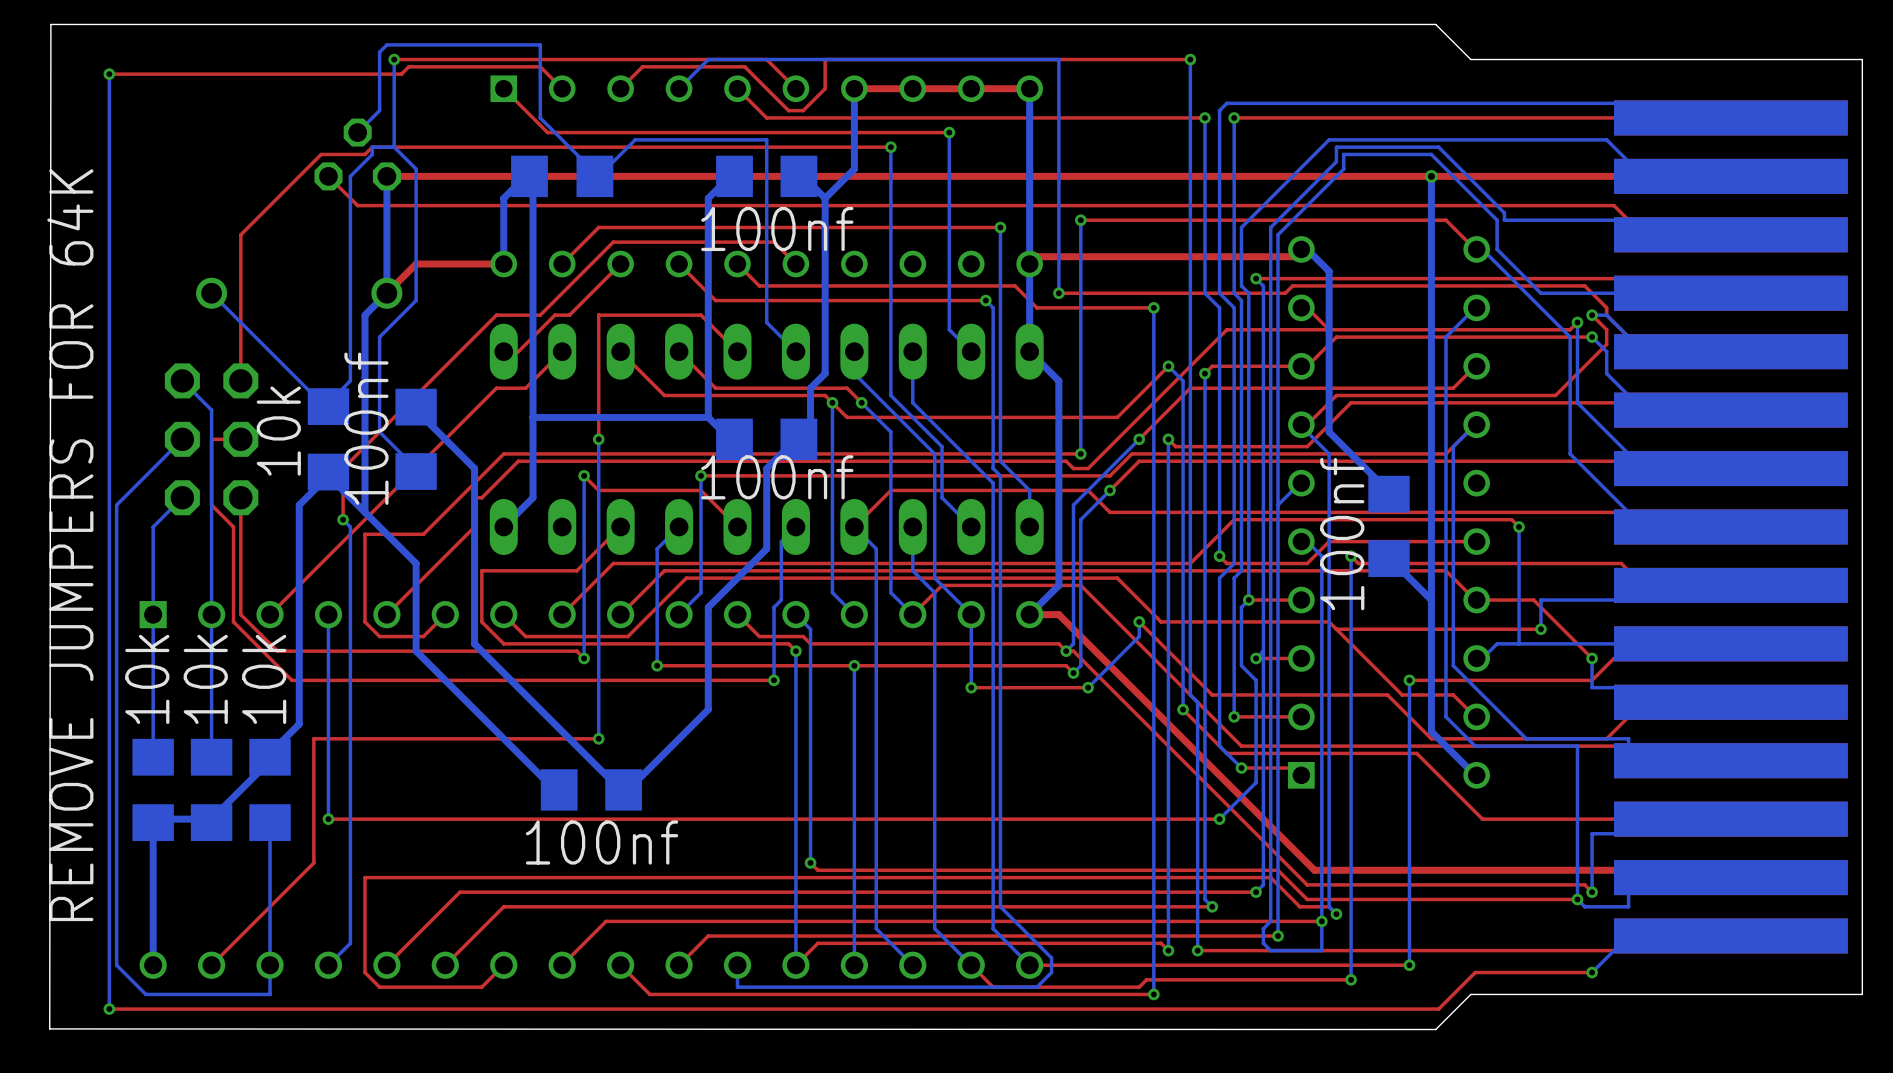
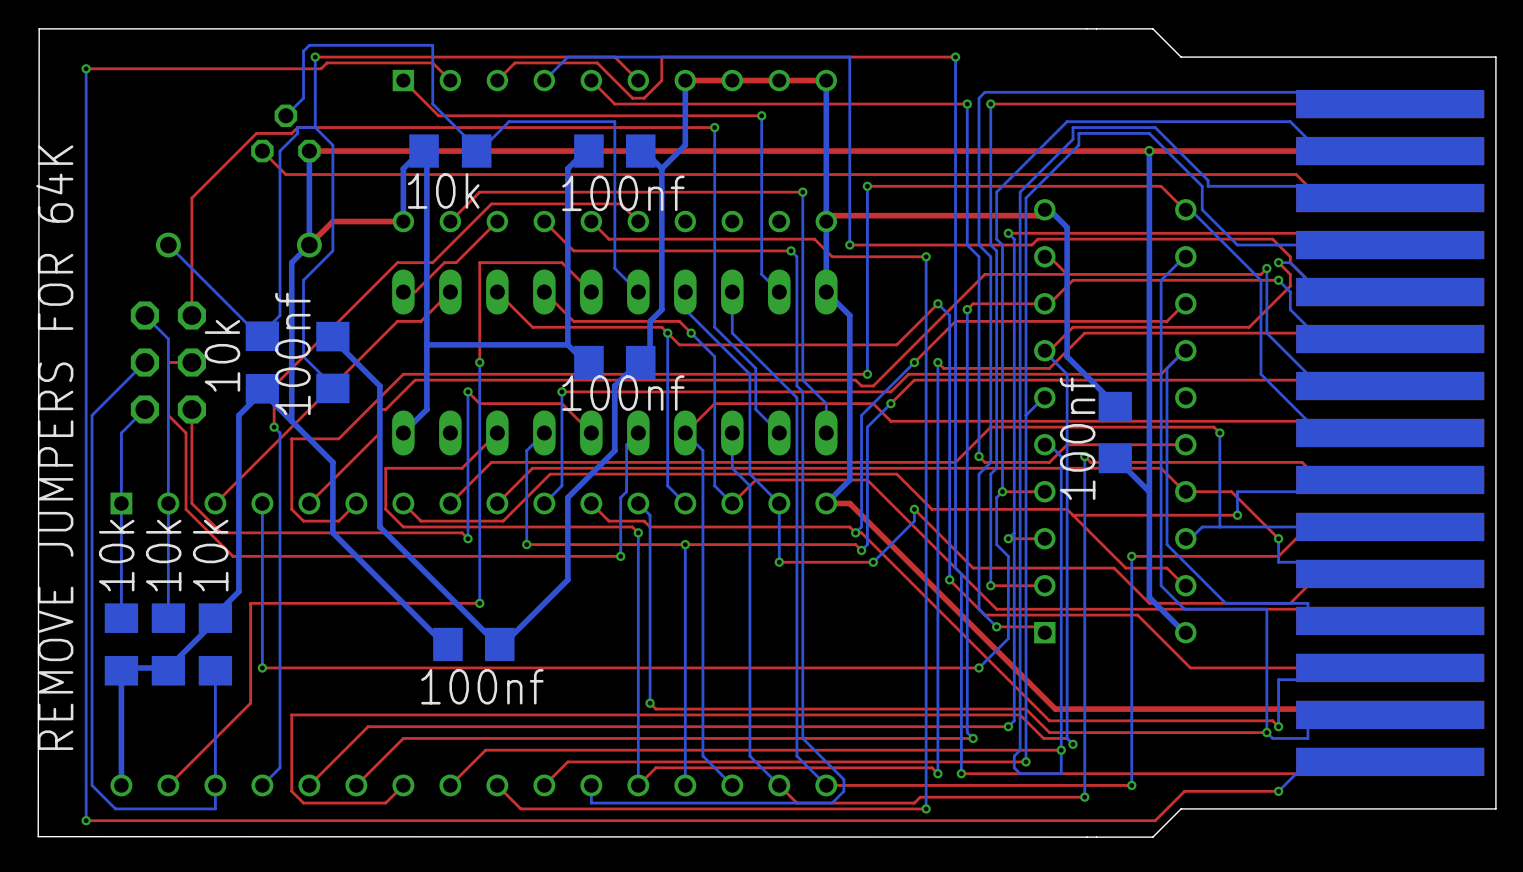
text: none -> 10k (443, 190)

